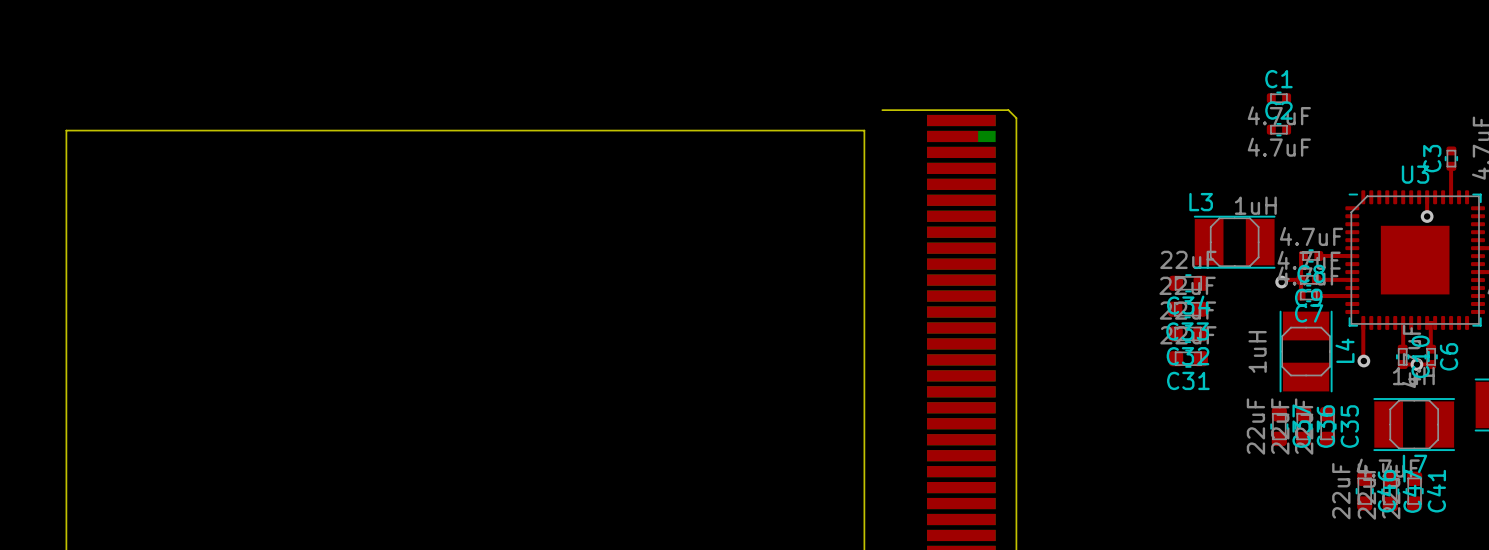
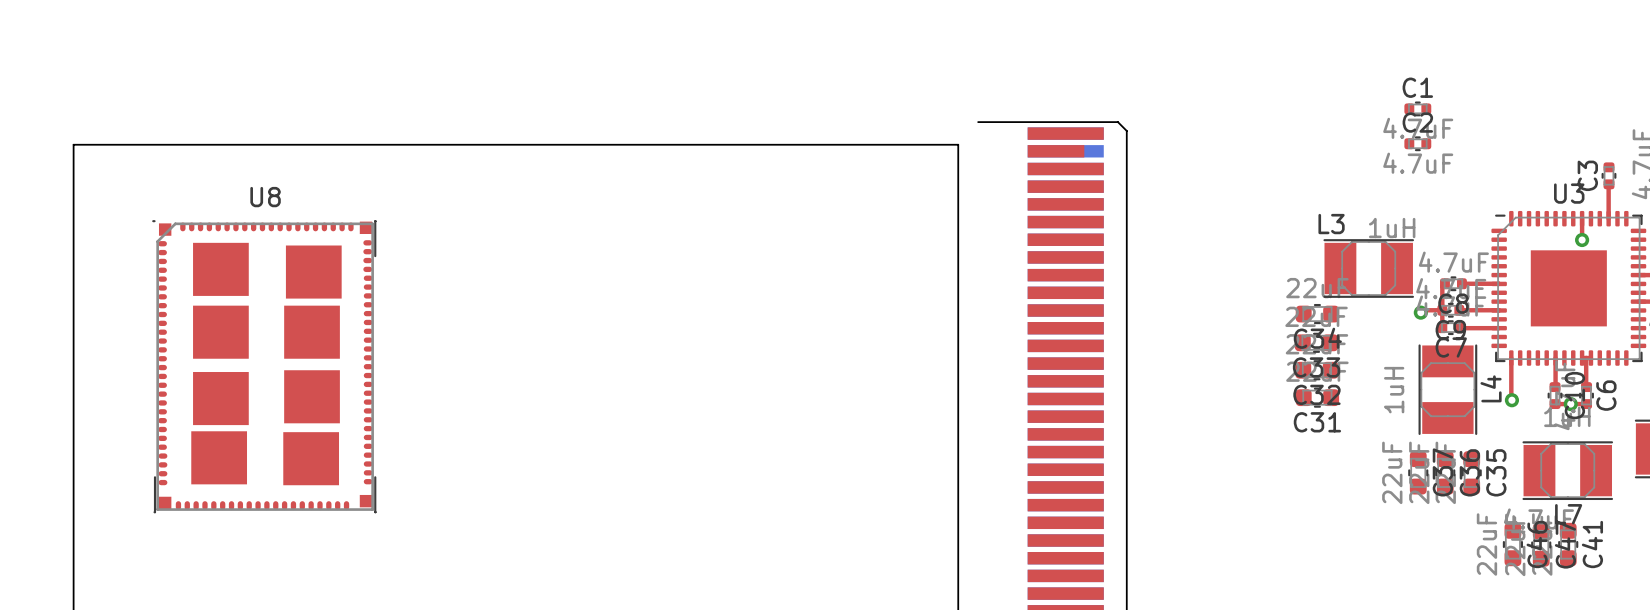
U8: none -> (264, 366)

